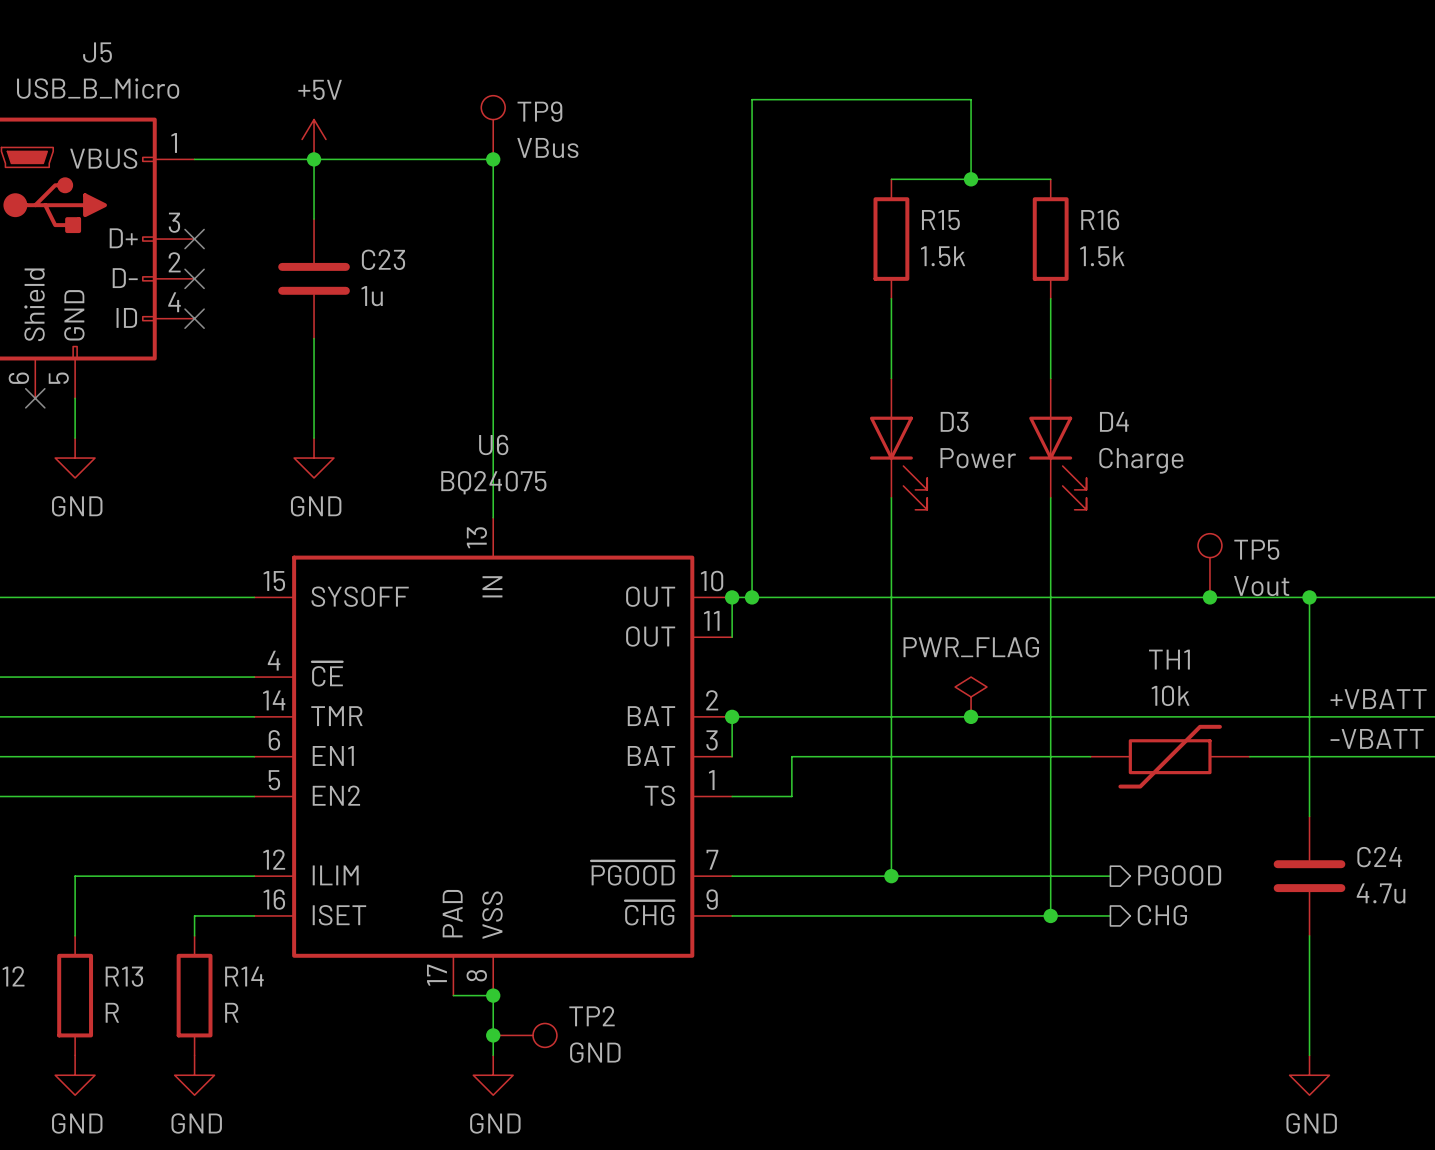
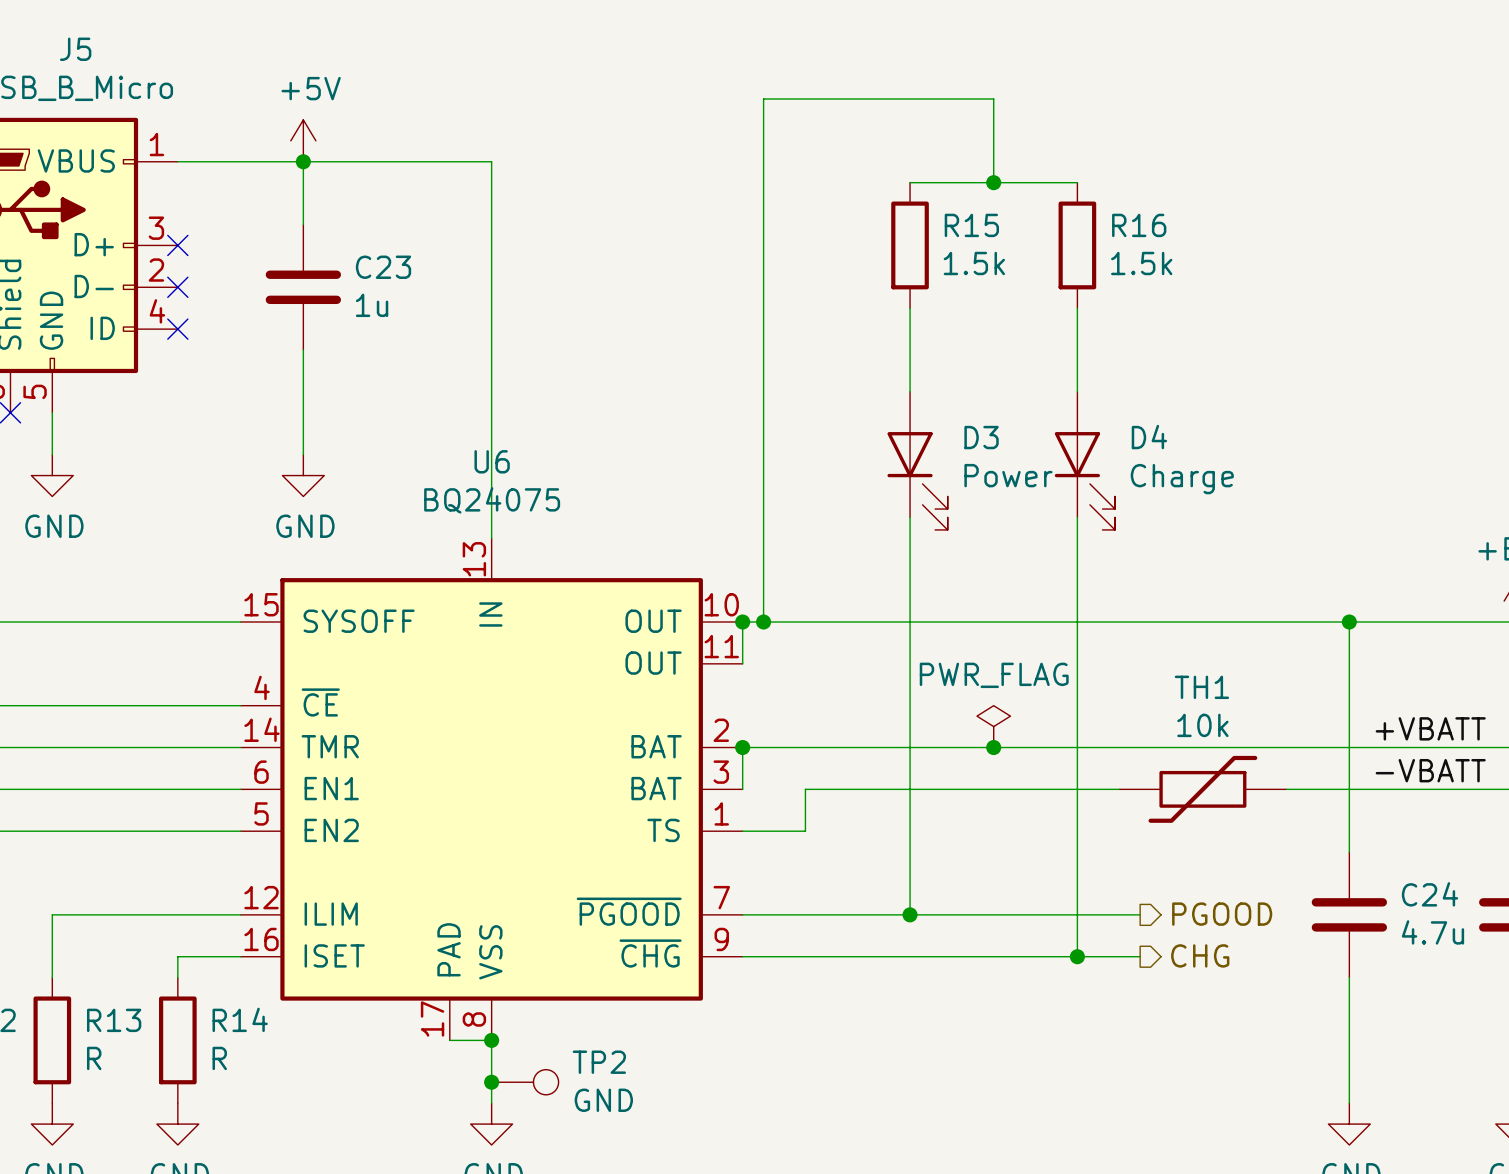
TP9: VBus (493, 127) -> none
junction: (493, 159) -> none
TP5: Vout (1209, 565) -> none
junction: (1209, 597) -> none

